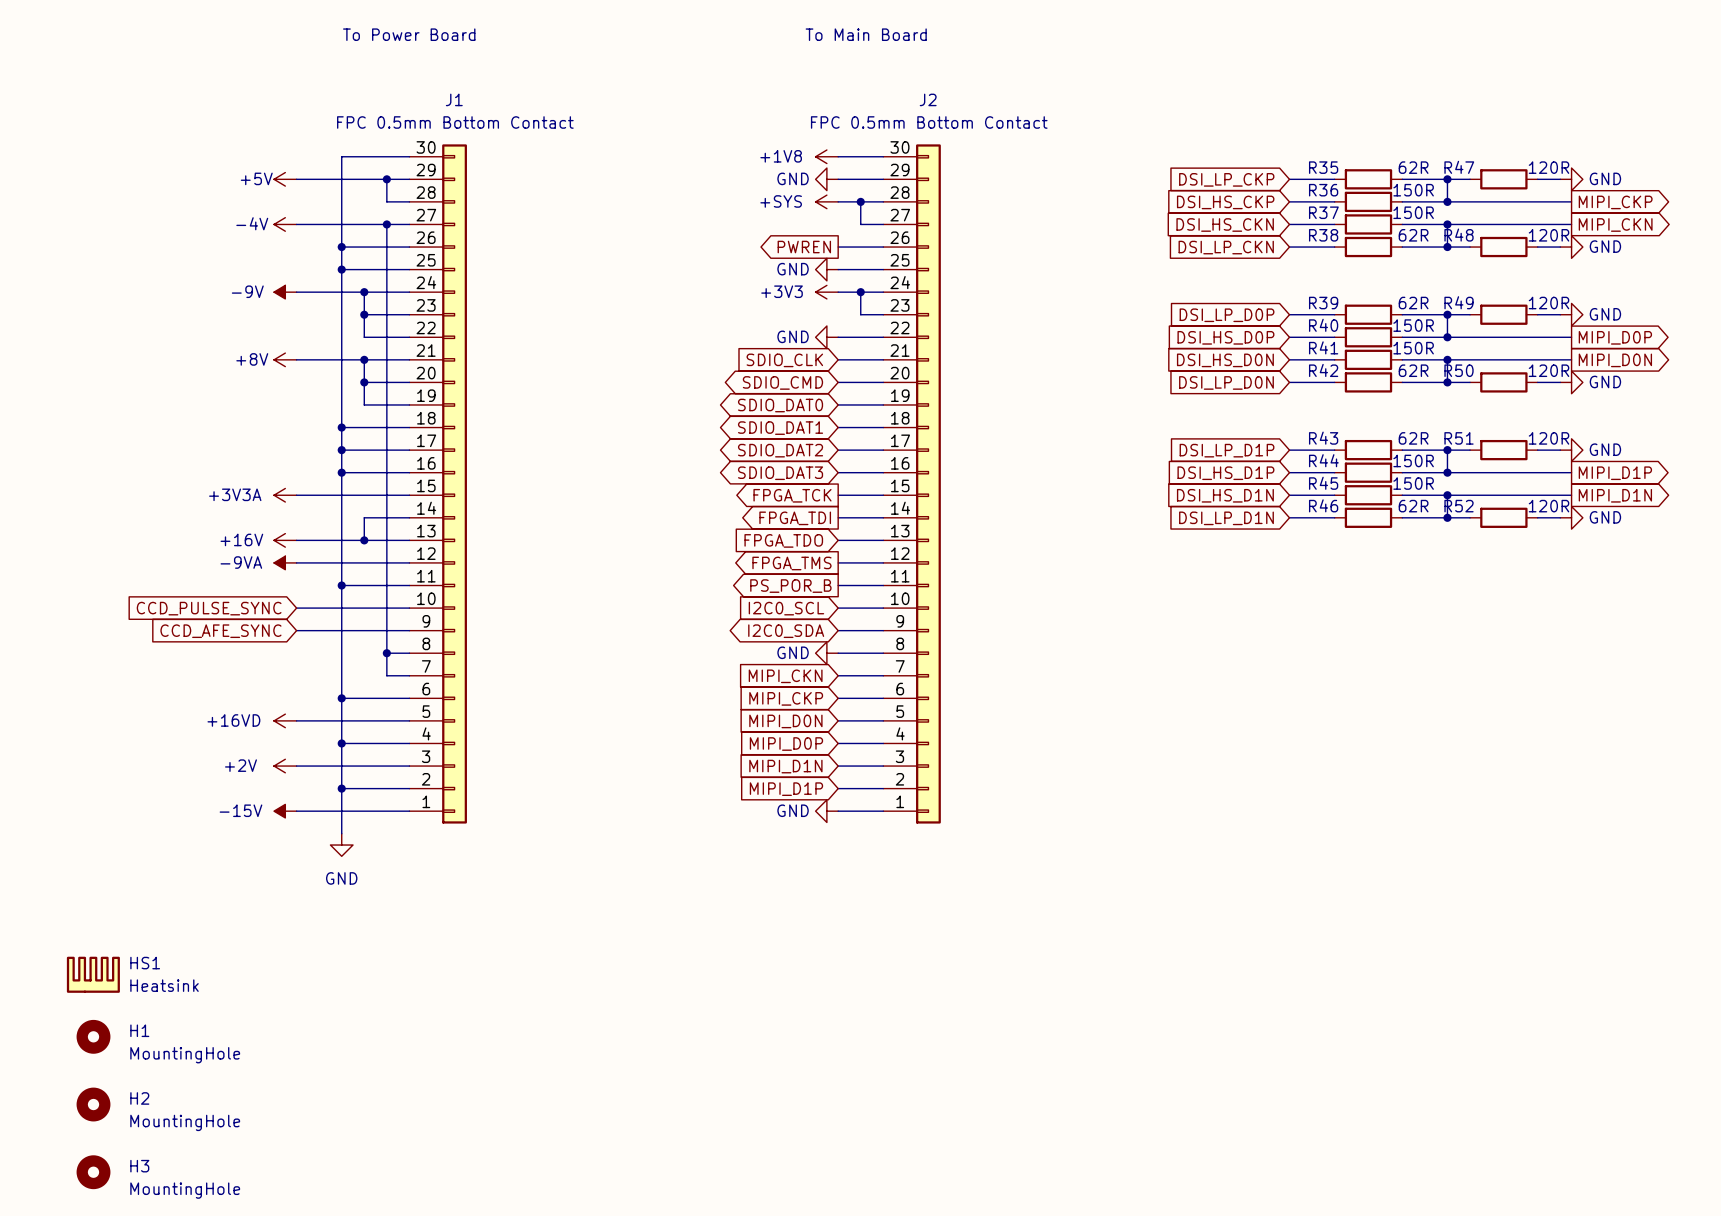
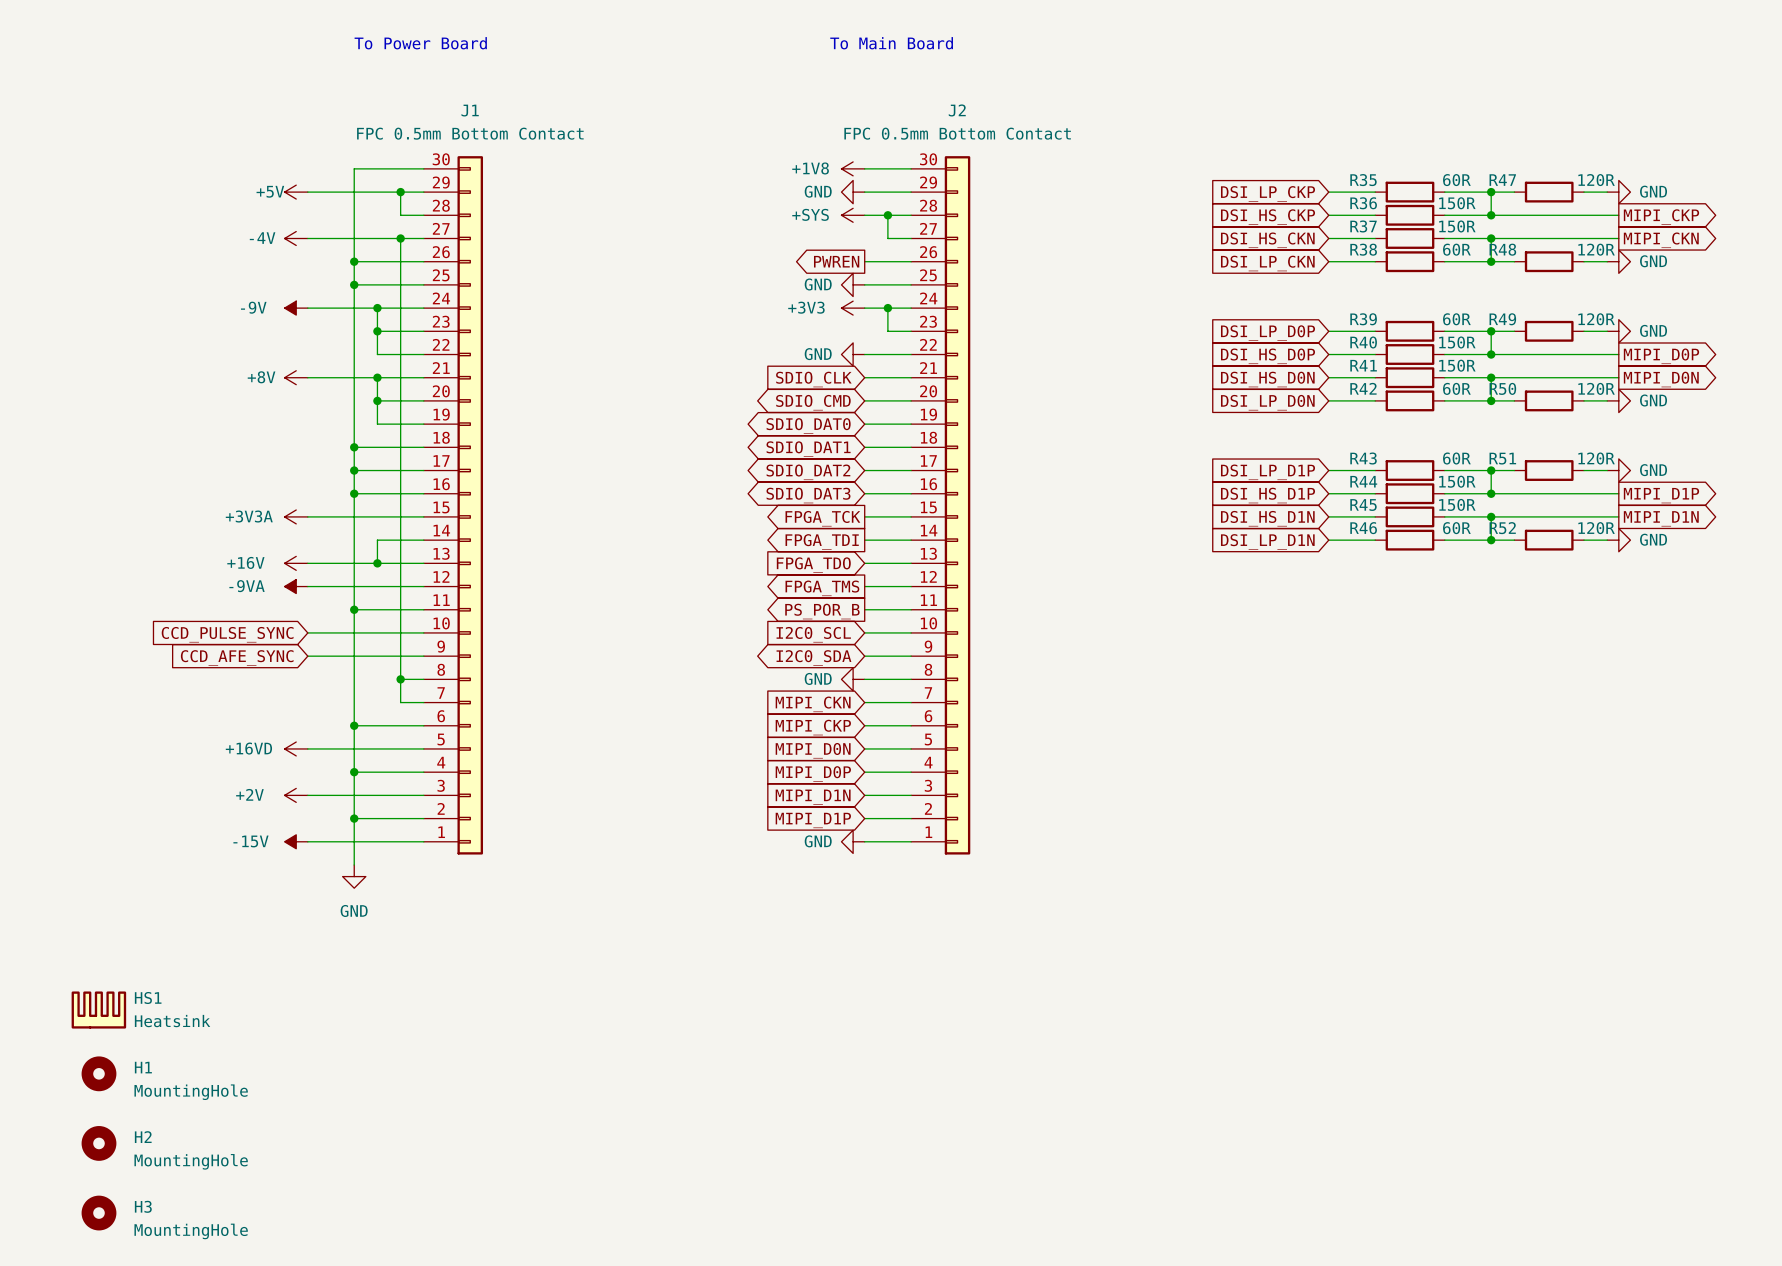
R35 value: 62R (1413, 167) -> 60R (1456, 180)
R38 value: 62R (1413, 235) -> 60R (1456, 249)
R39 value: 62R (1413, 303) -> 60R (1456, 319)
R42 value: 62R (1413, 370) -> 60R (1456, 388)
R43 value: 62R (1413, 438) -> 60R (1456, 458)
R46 value: 62R (1413, 506) -> 60R (1456, 528)

